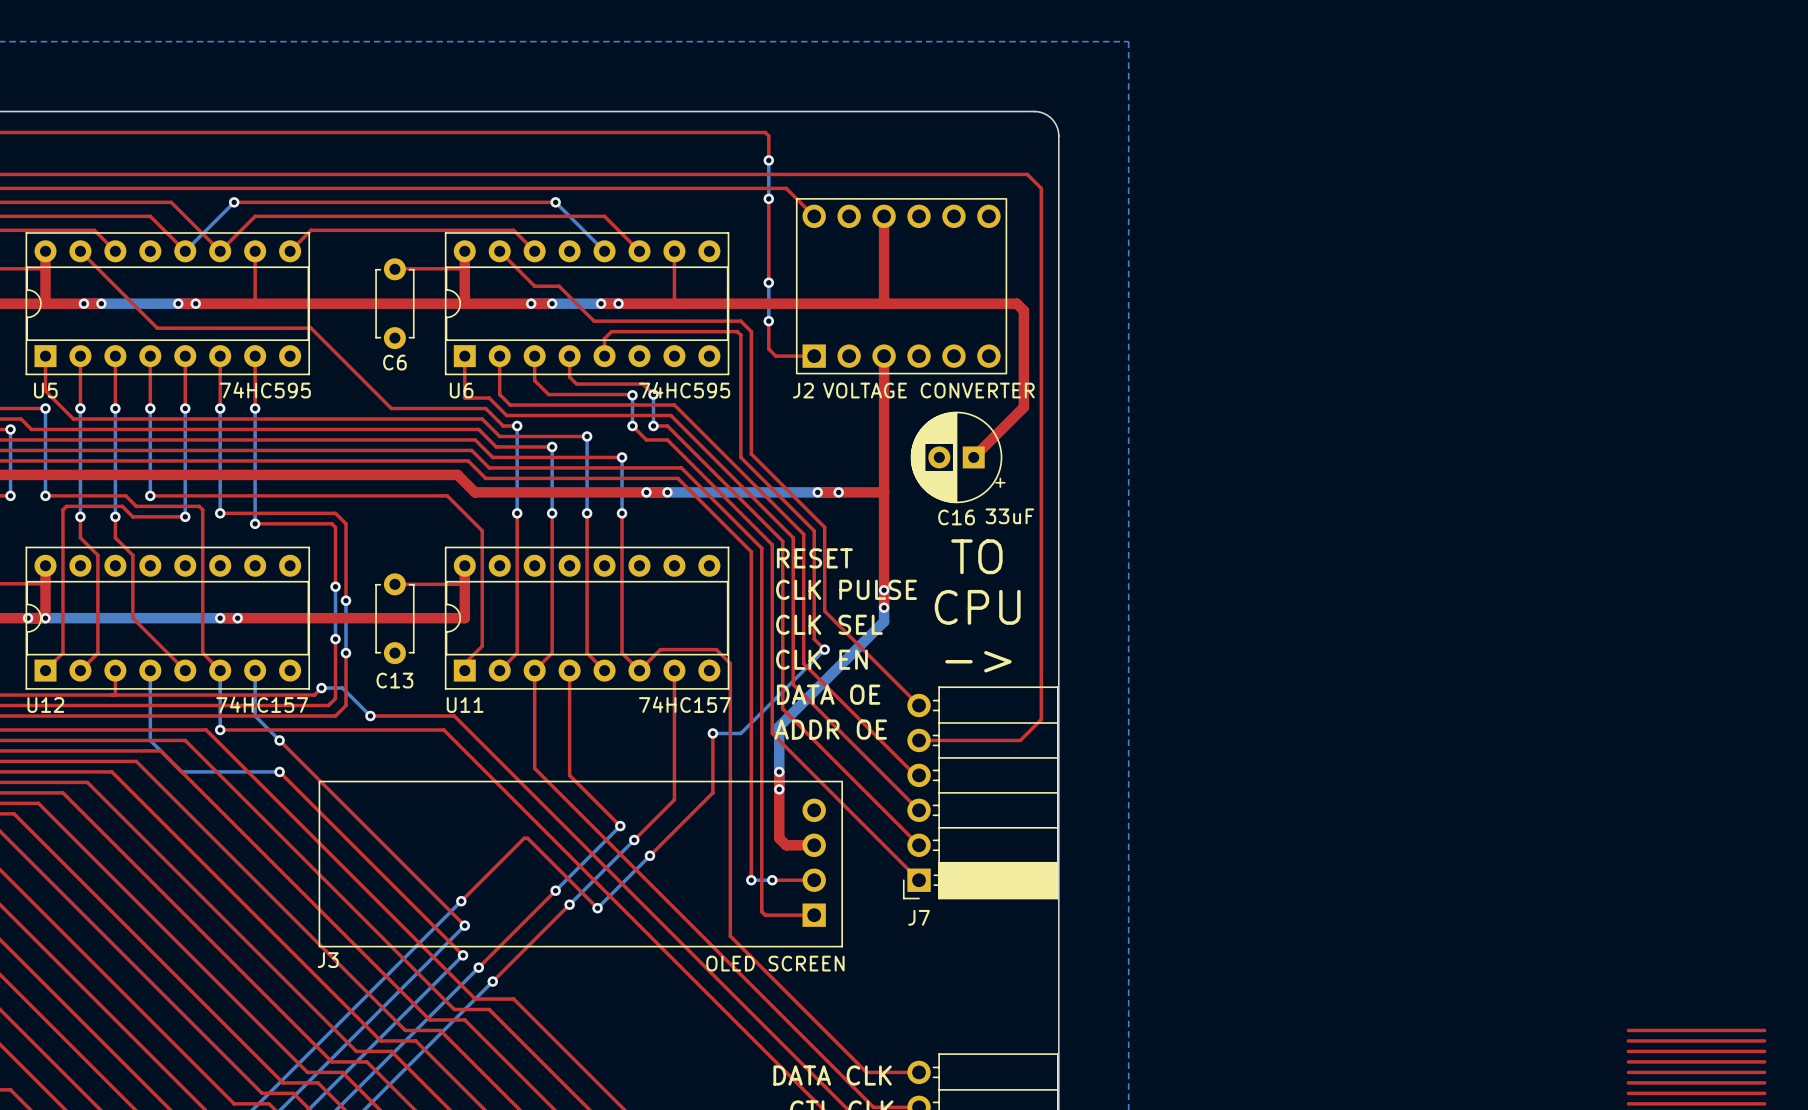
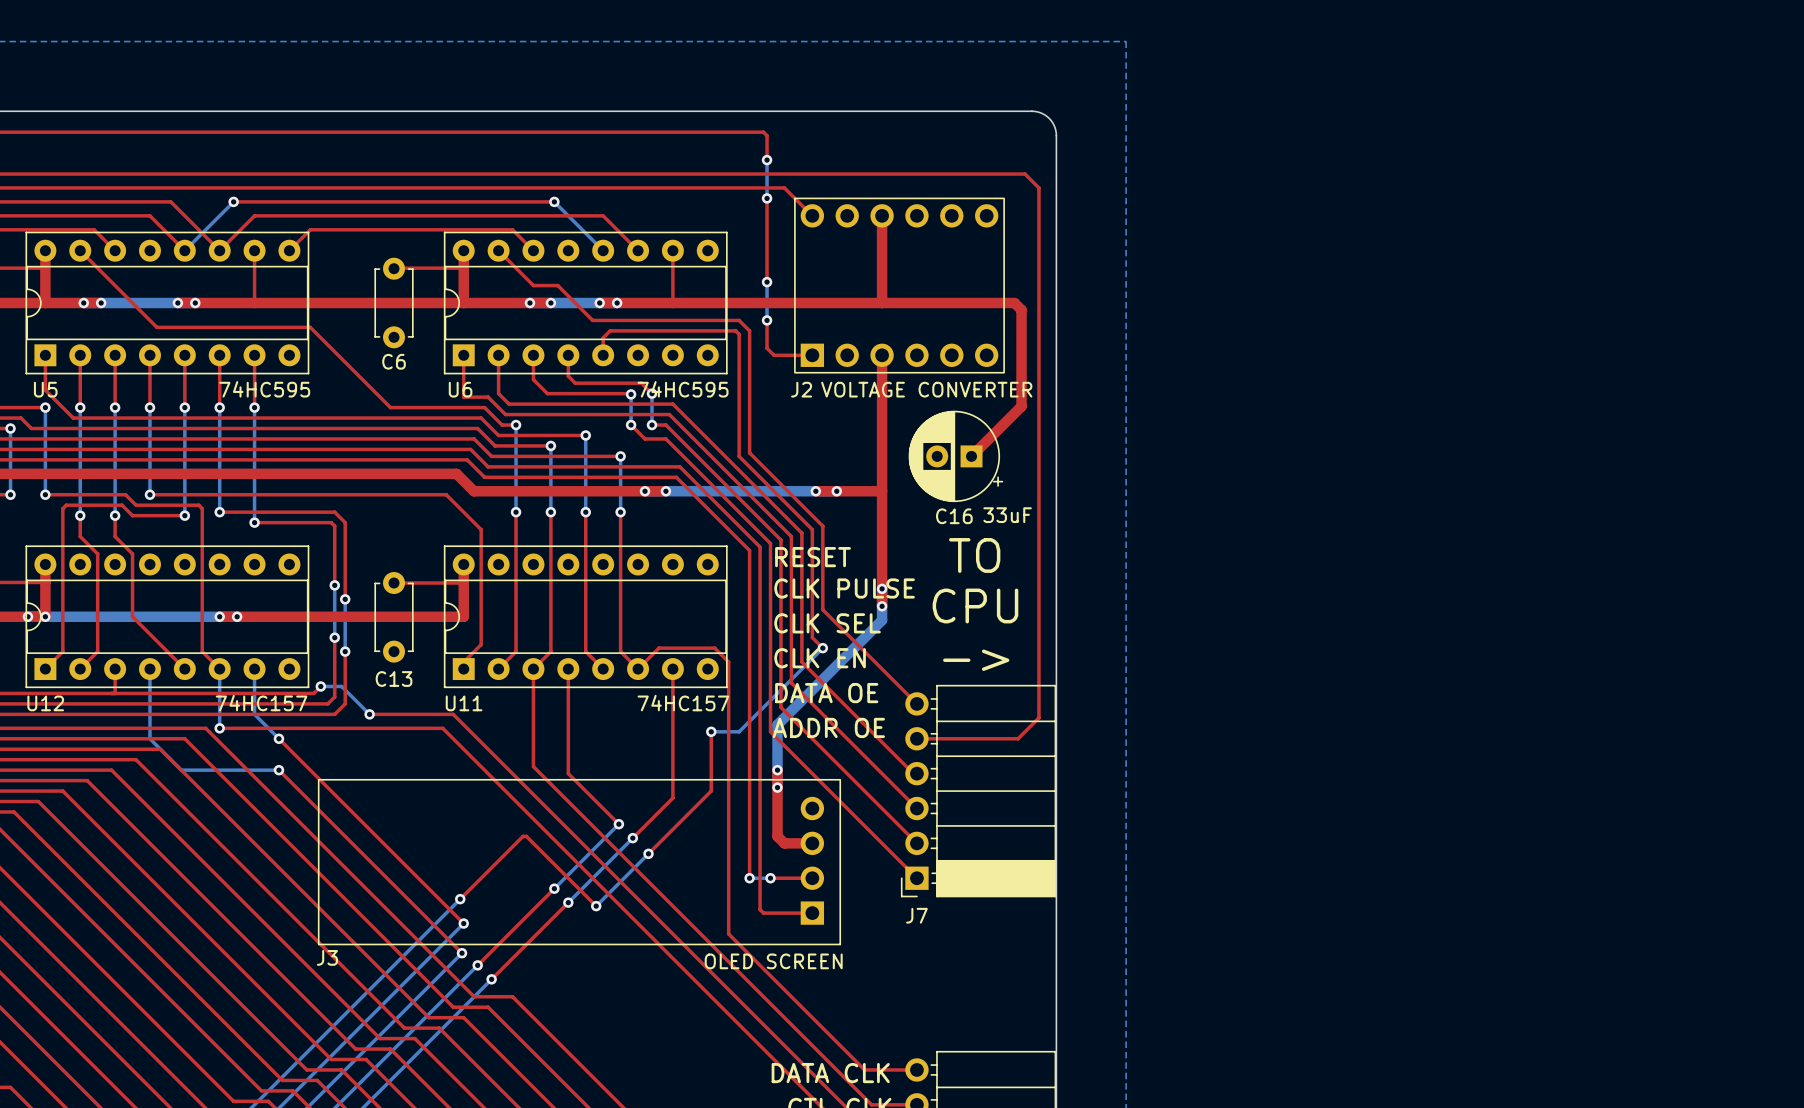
top track: (1628, 1030) (1764, 1030) -> none
top track: (1628, 1040) (1764, 1040) -> none
top track: (1628, 1051) (1764, 1051) -> none
top track: (1628, 1061) (1764, 1061) -> none
top track: (1628, 1072) (1764, 1072) -> none
top track: (1628, 1082) (1764, 1082) -> none
top track: (1628, 1093) (1764, 1093) -> none
top track: (1628, 1103) (1764, 1103) -> none

